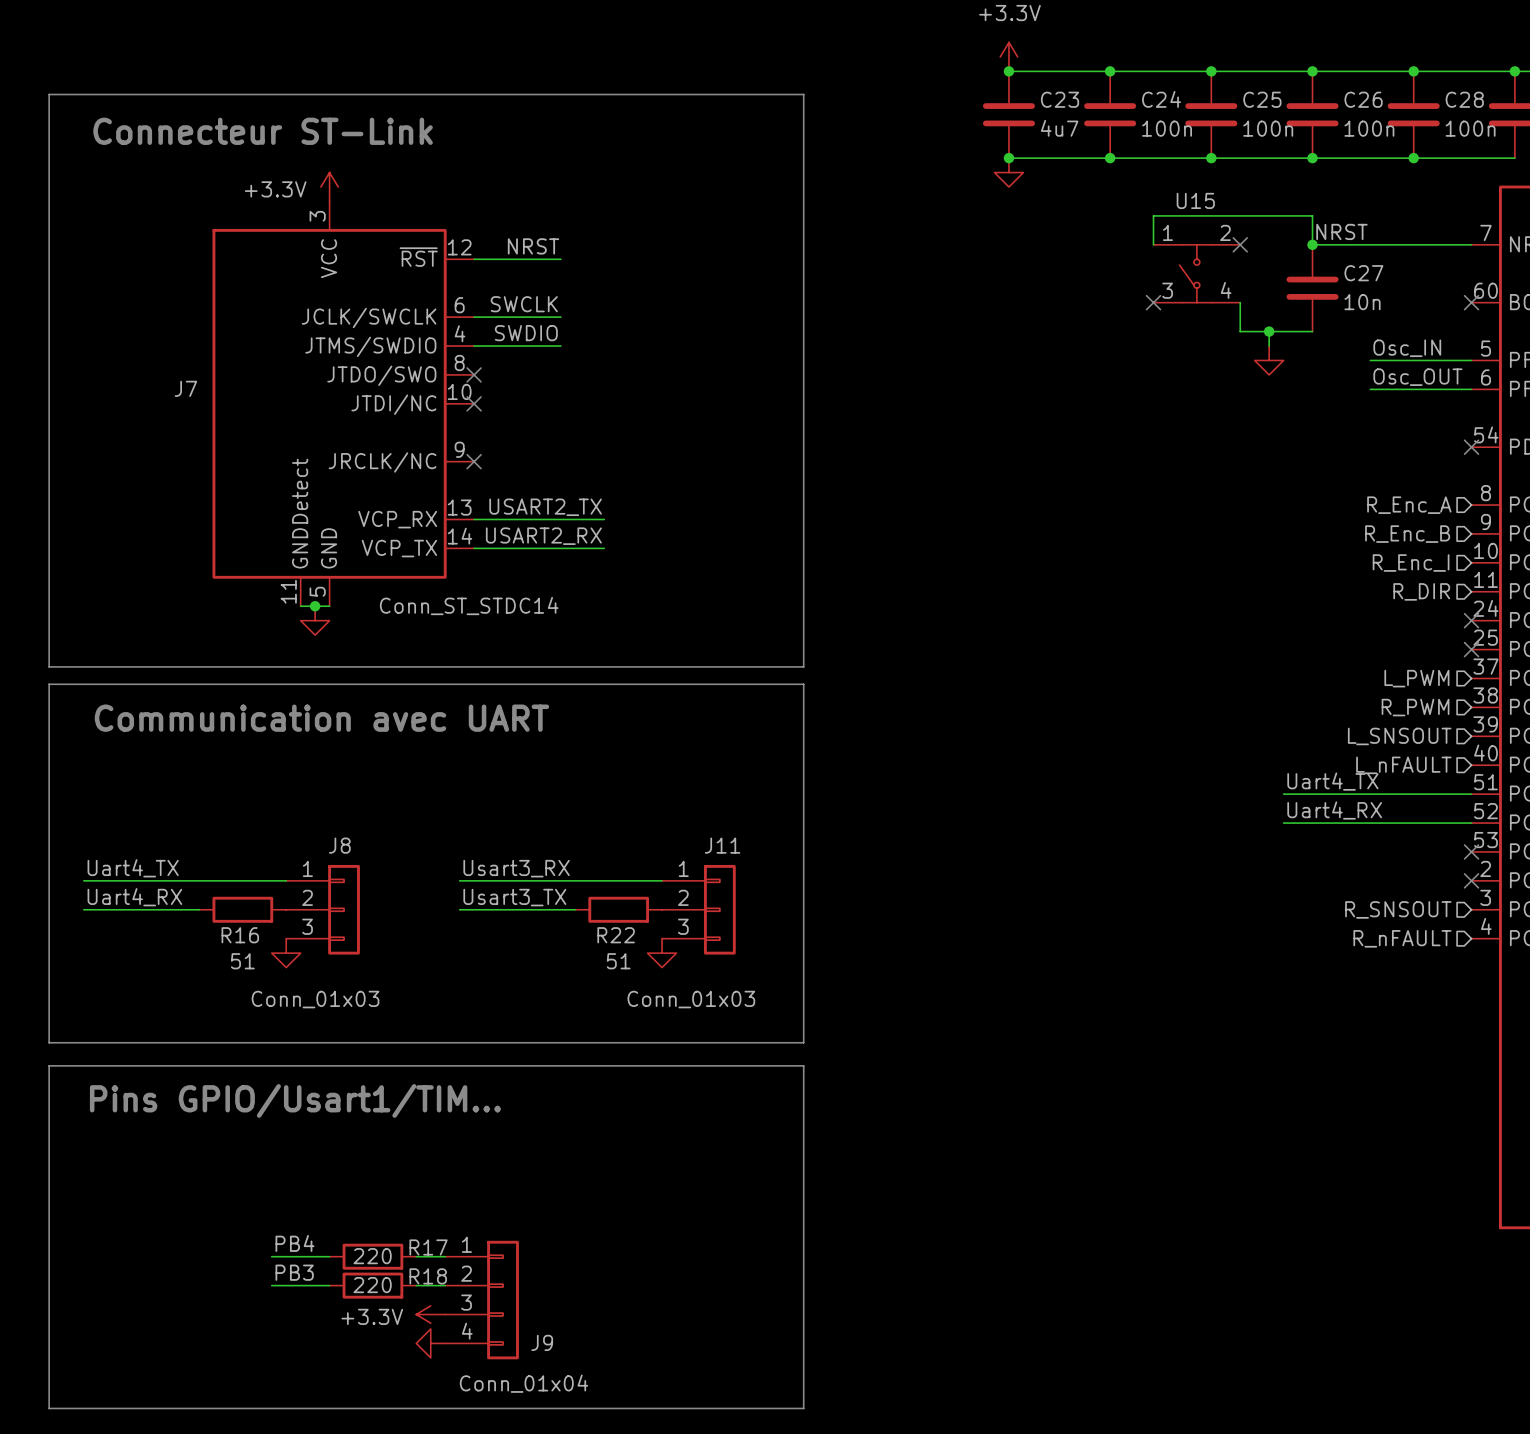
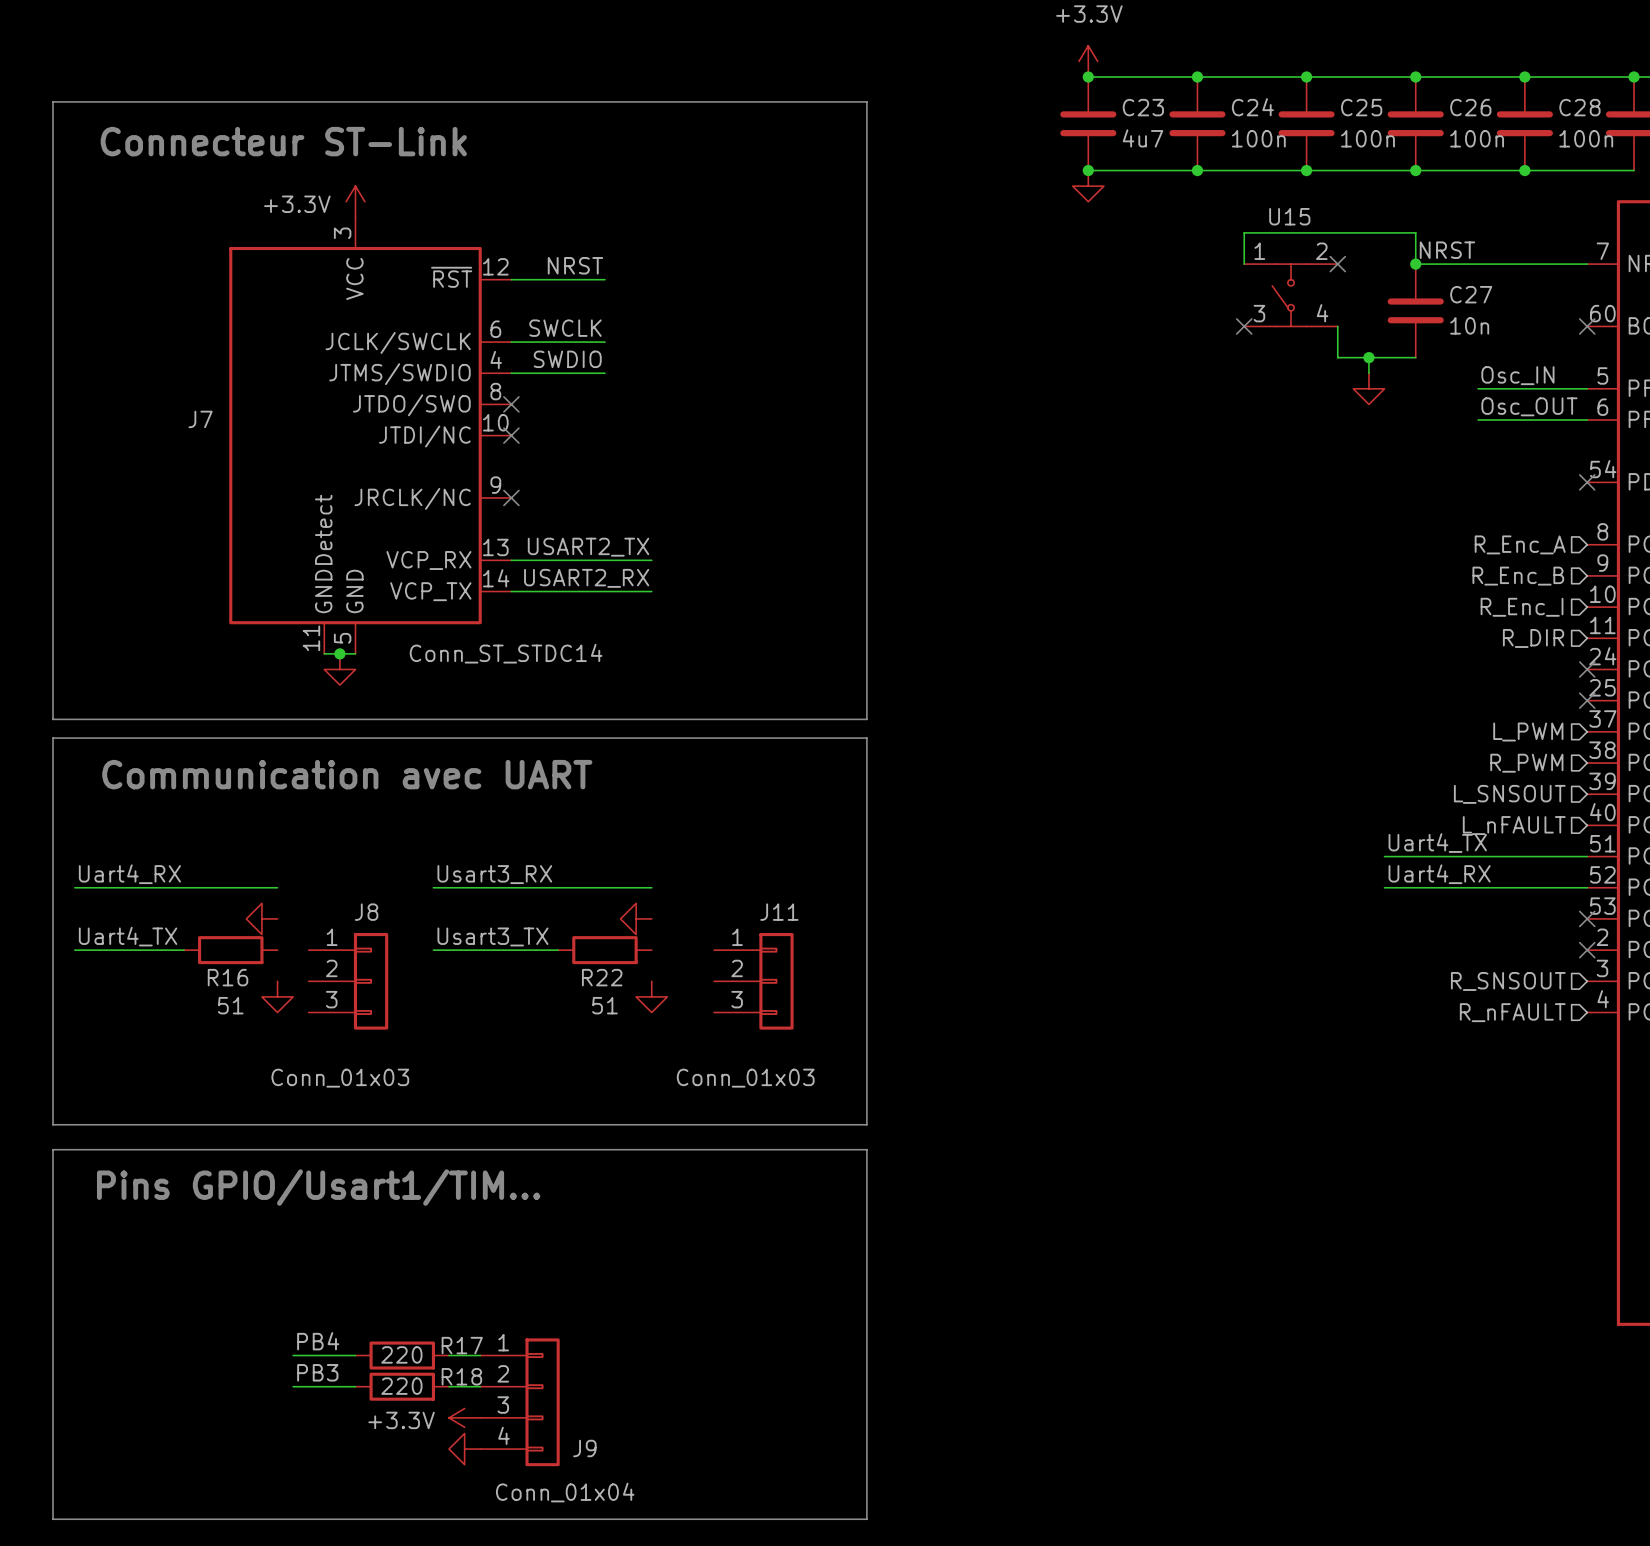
wire: none -> (74, 887) (277, 887)
wire: none -> (433, 887) (651, 887)
power symbol: none -> (261, 918)
power symbol: none -> (636, 918)
label position: Uart4_TX (133, 868) -> Uart4_TX (128, 936)
label position: Usart3_RX (516, 868) -> Usart3_RX (494, 874)
wire: none -> (74, 950) (90, 950)
wire: (170, 880) (286, 880) -> none
wire: none -> (433, 950) (495, 950)
wire: (517, 880) (662, 880) -> none
label position: Uart4_RX (134, 897) -> Uart4_RX (129, 874)
label position: Usart3_TX (514, 897) -> Usart3_TX (492, 936)
wire: (83, 909) (199, 909) -> none
R16 position: (242, 909) -> (230, 950)
wire: (459, 909) (575, 909) -> none
R22 position: (618, 909) -> (604, 950)
power symbol: none -> (651, 996)
power symbol position: (286, 953) -> (277, 996)
power symbol: (662, 953) -> none

